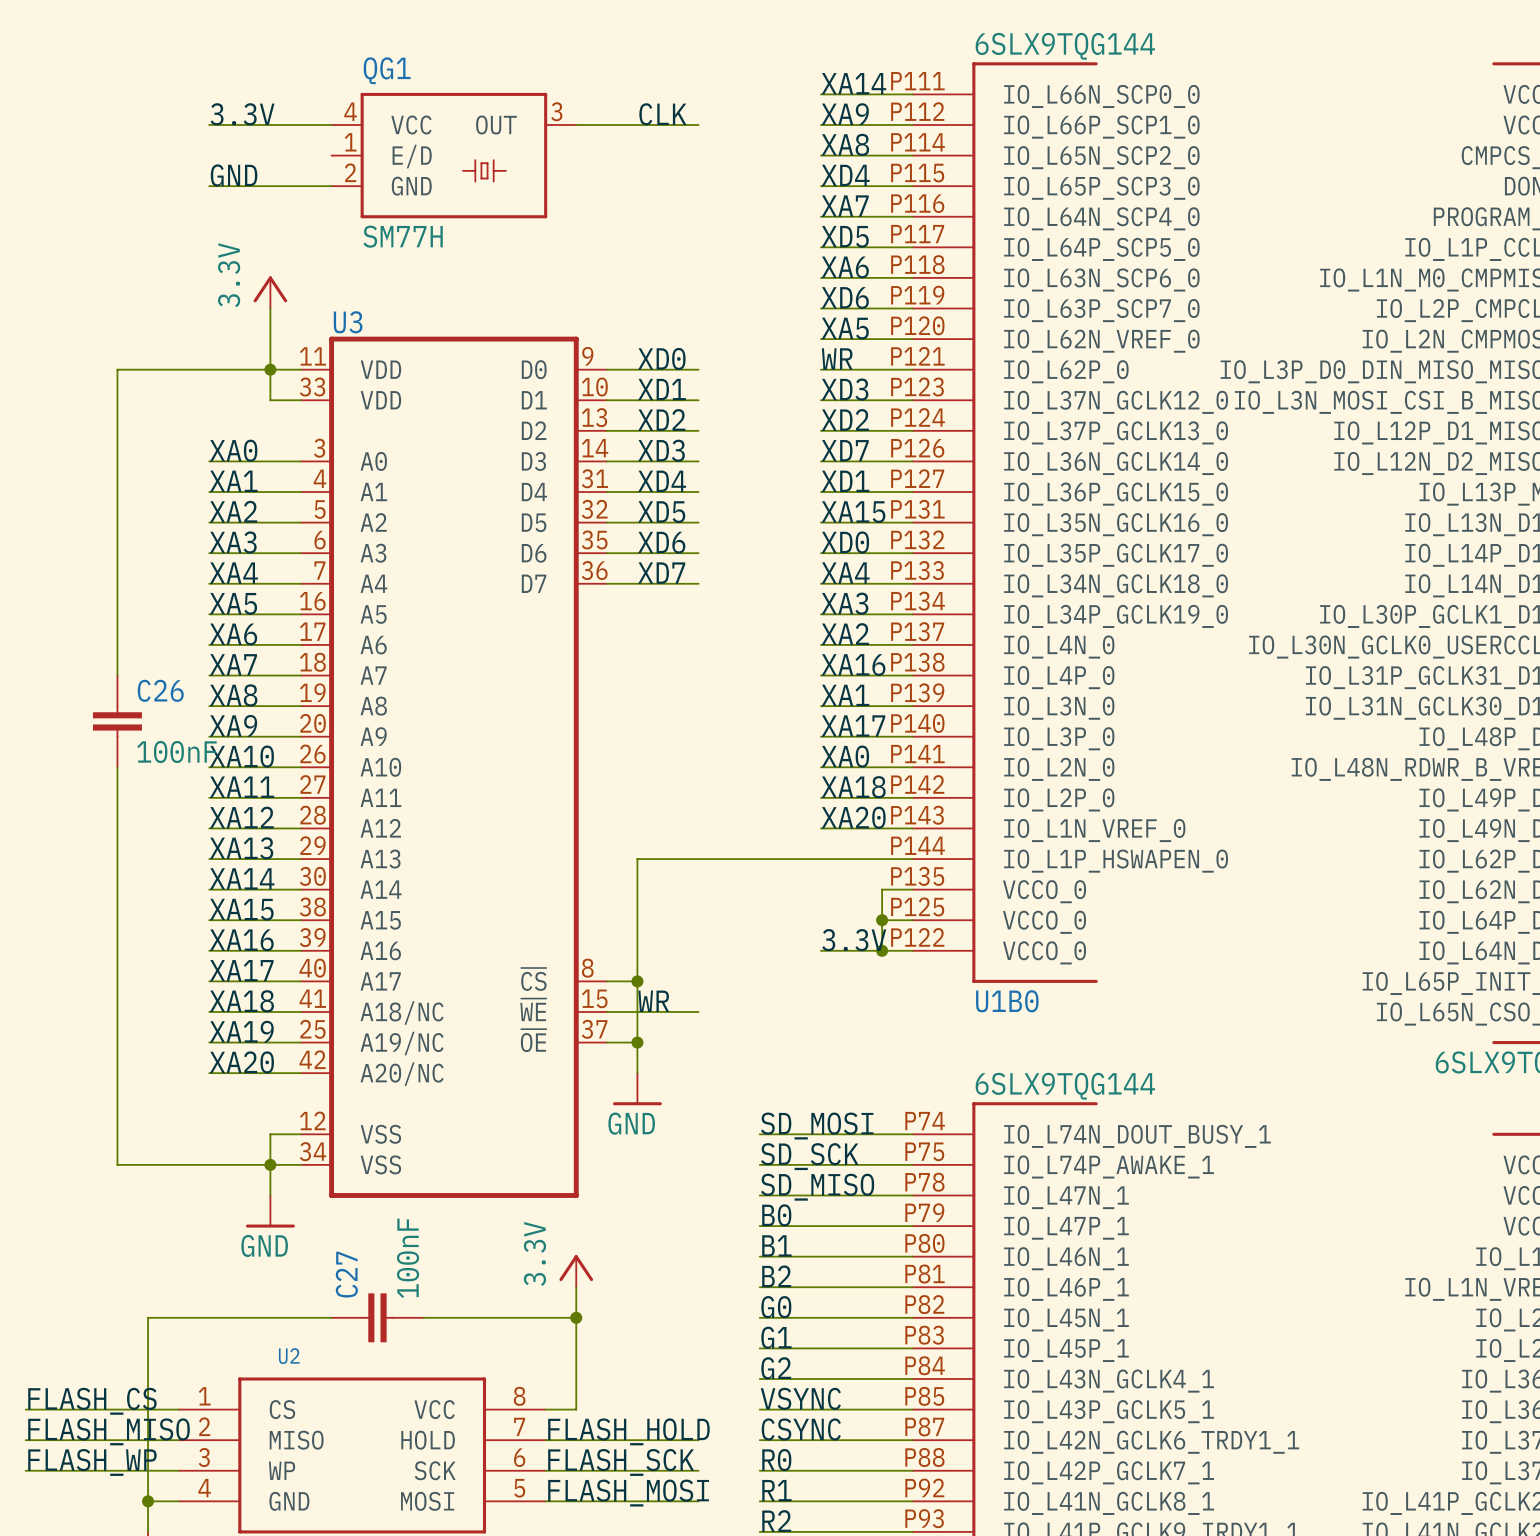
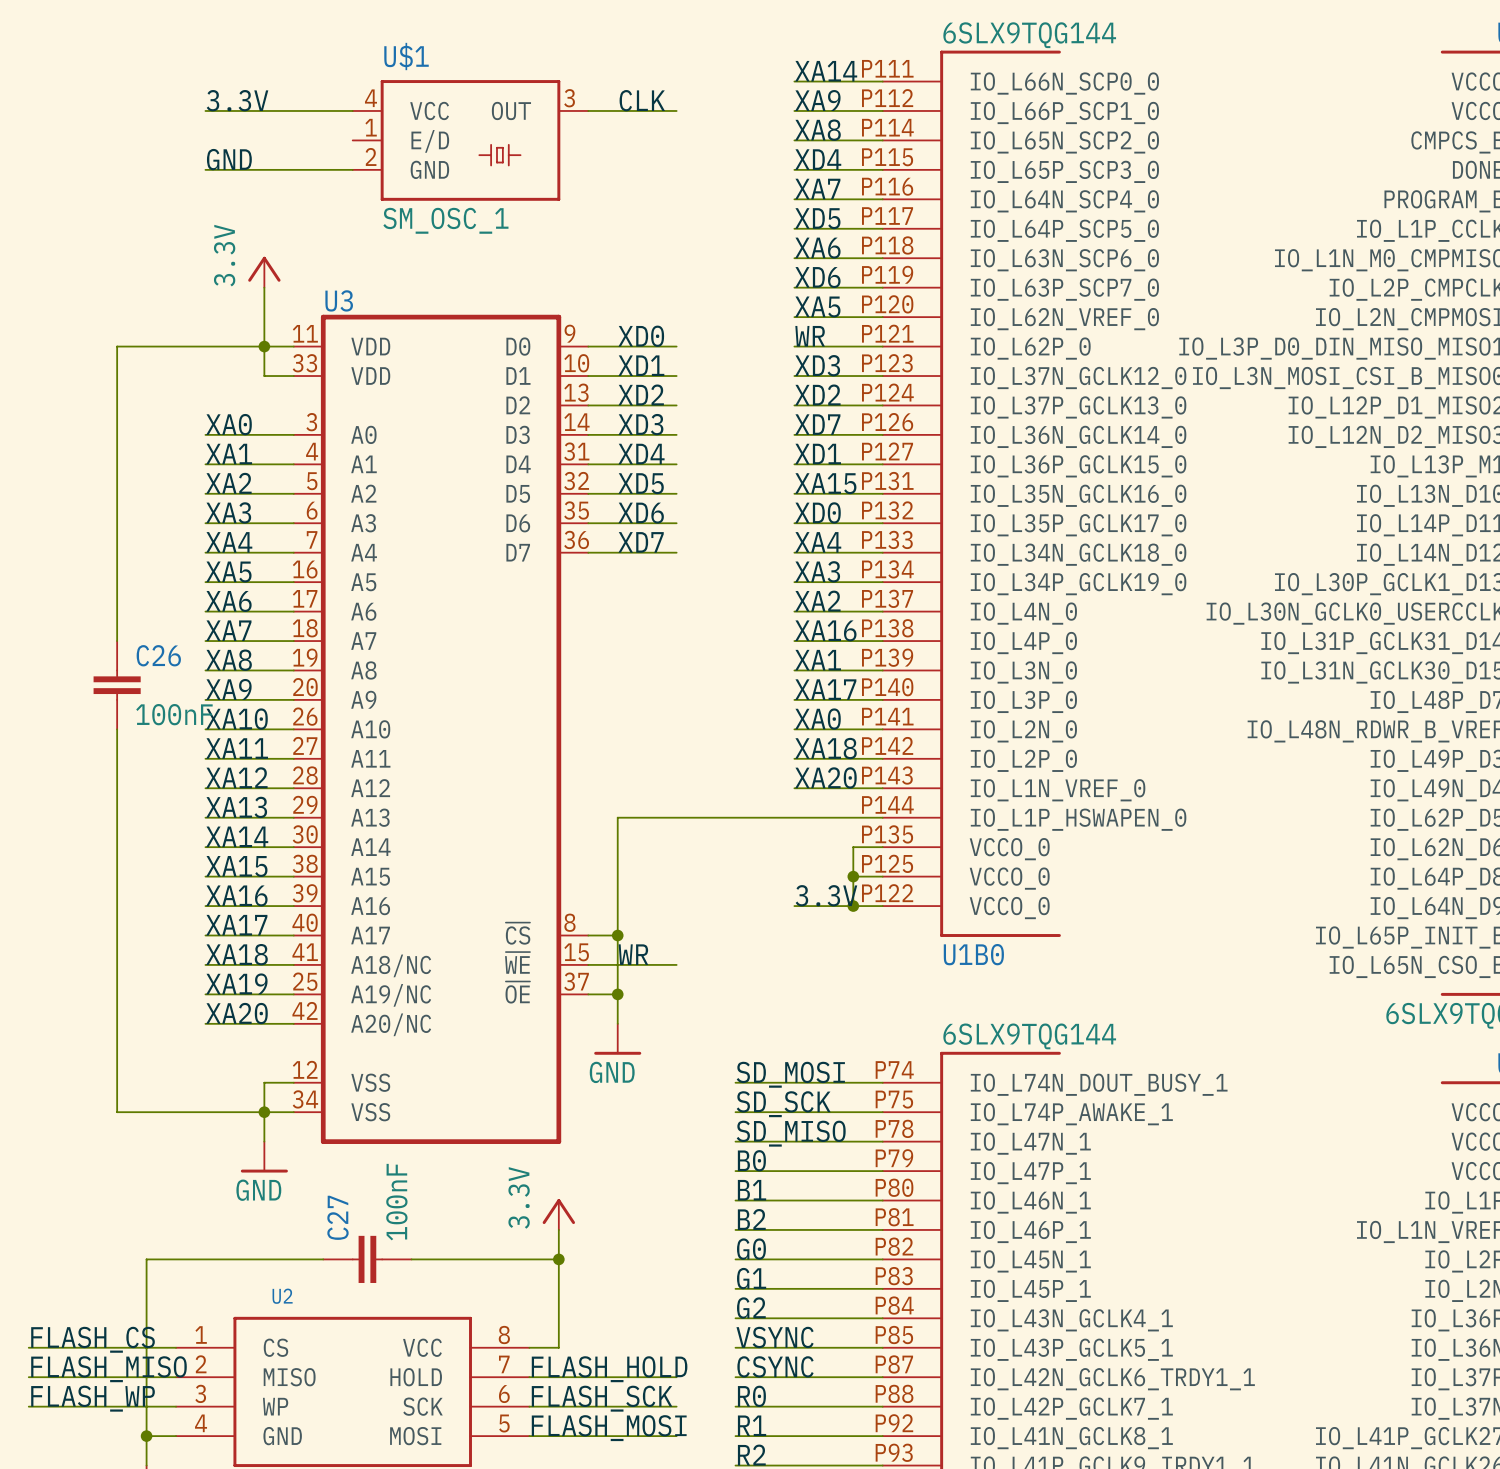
QG1: SM77H (453, 155) -> none
U$1: none -> SM_OSC_1 (470, 140)

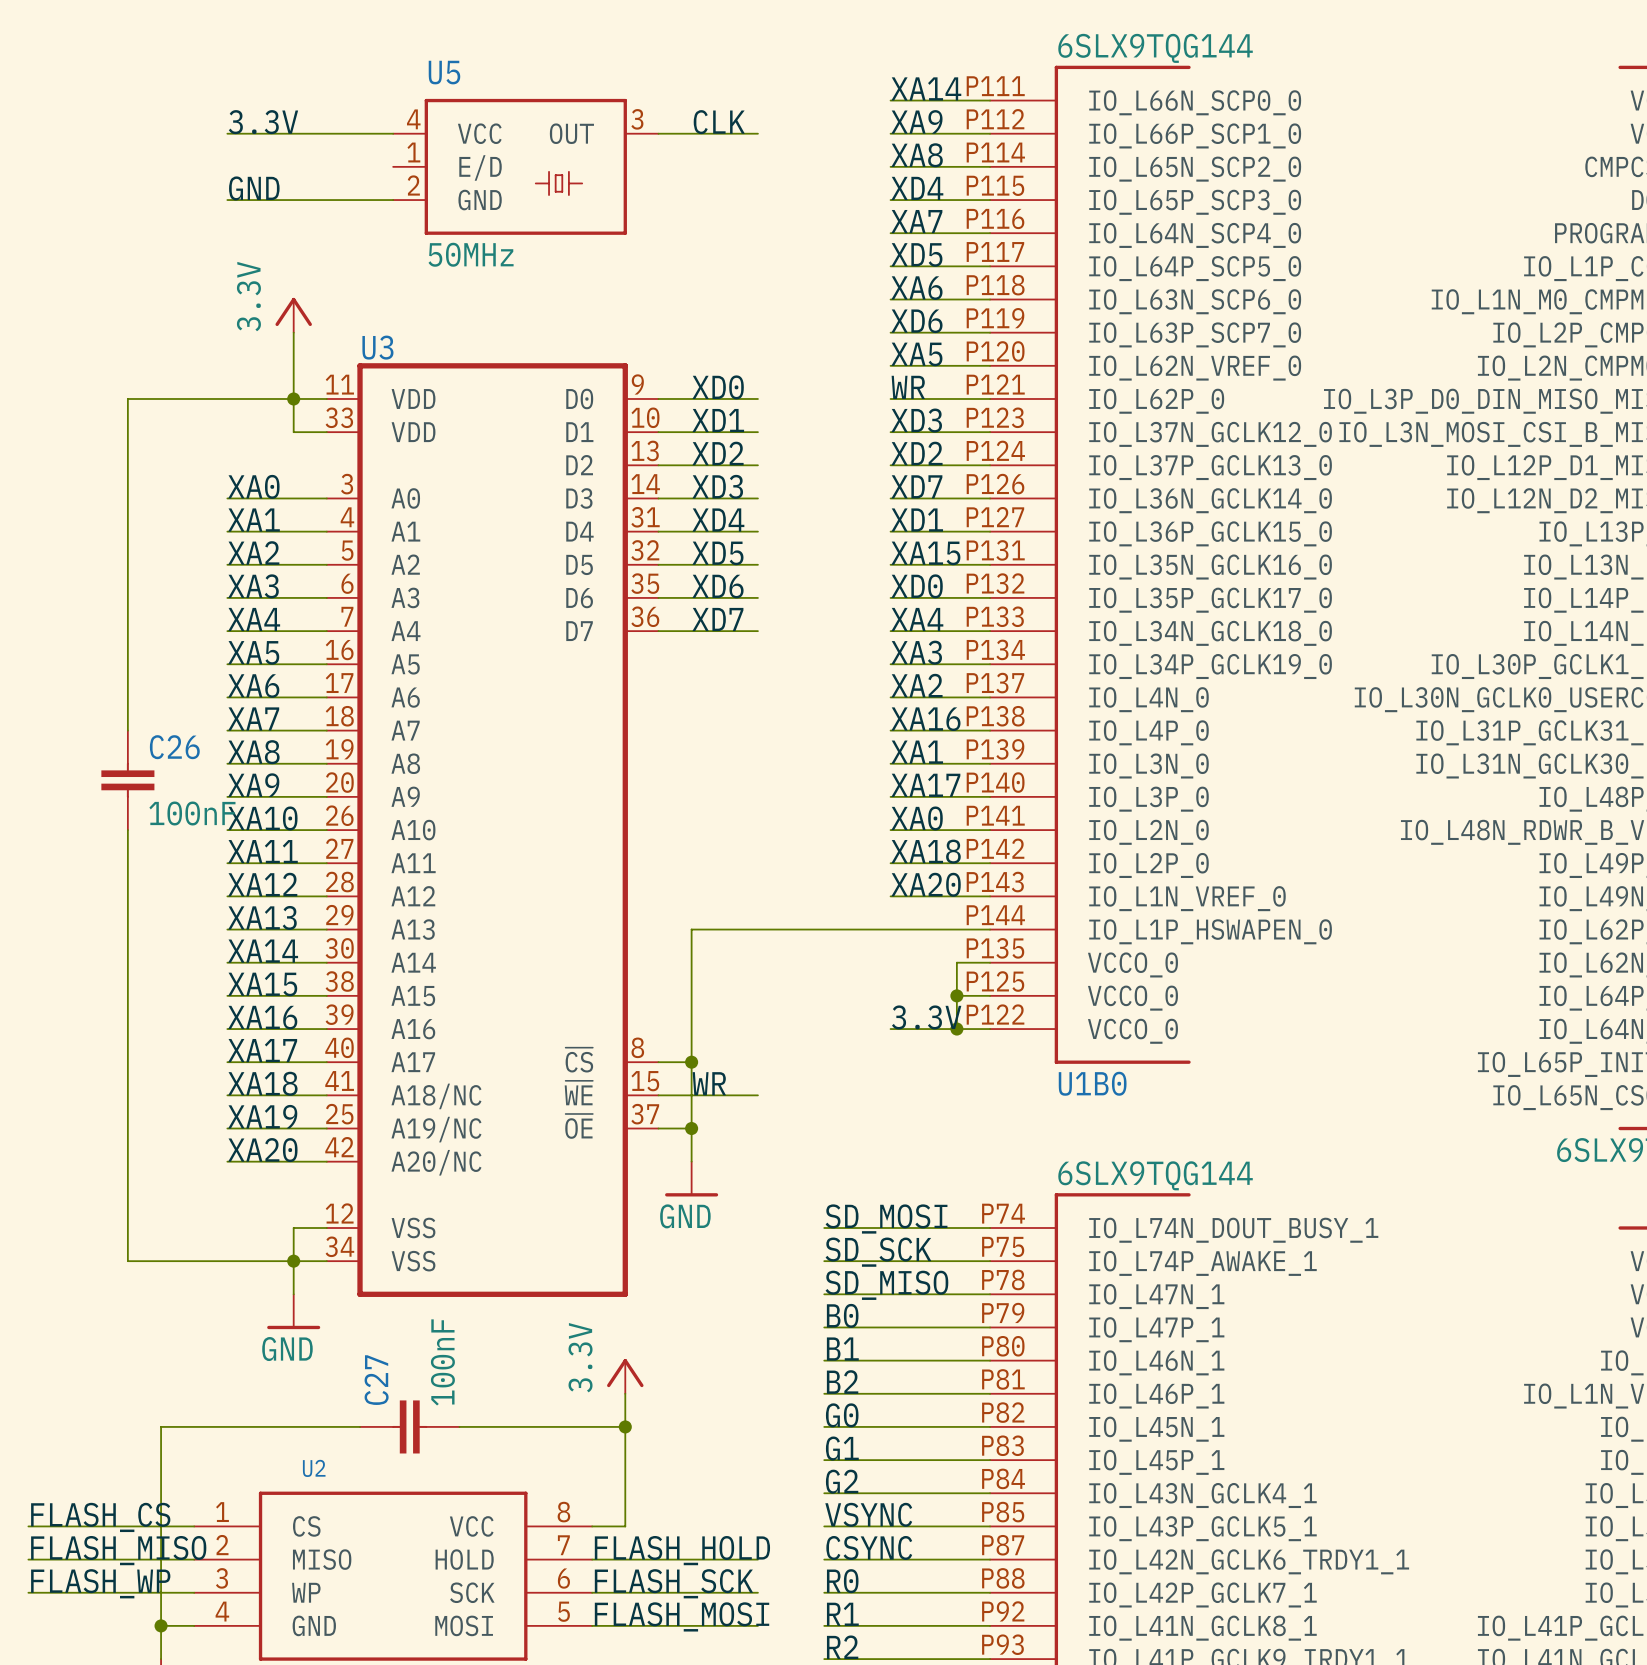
U$1 name: U$1 (406, 56) -> U5 (444, 72)
U$1 value: SM_OSC_1 (445, 220) -> 50MHz (471, 254)

